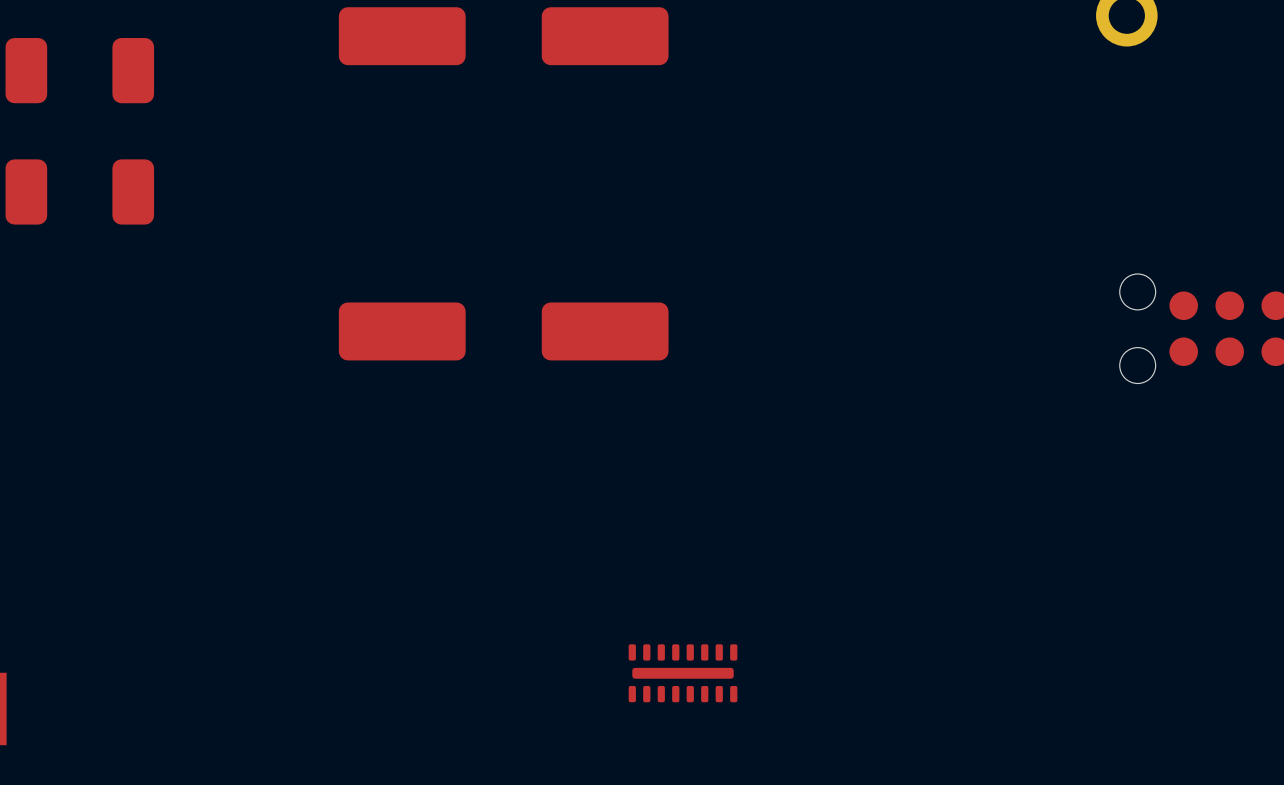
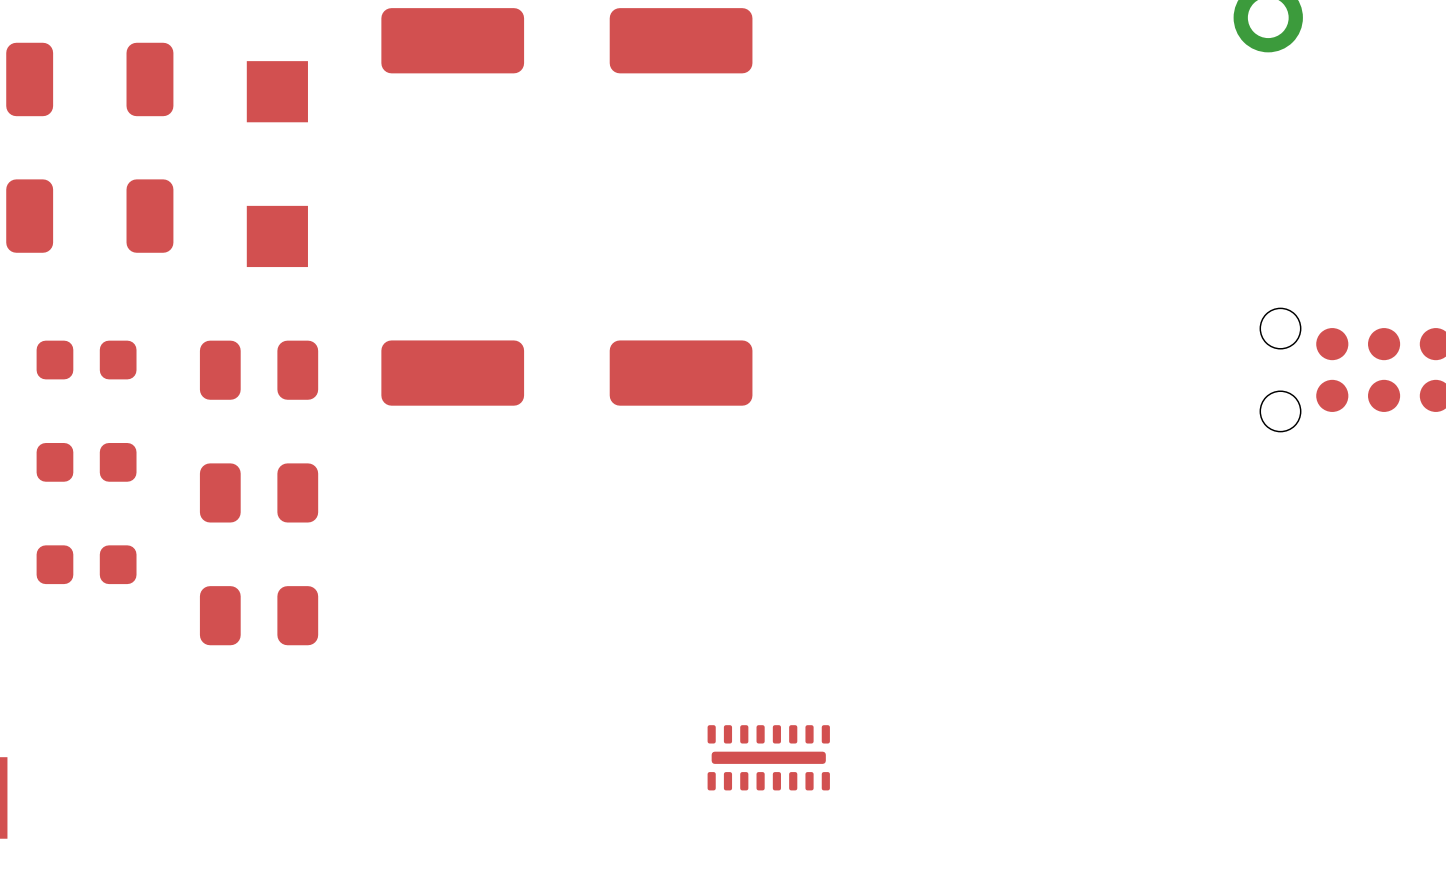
part: none -> (277, 91)
part: none -> (277, 236)
part: none -> (86, 360)
part: none -> (259, 370)
part: none -> (86, 462)
part: none -> (259, 492)
part: none -> (86, 564)
part: none -> (259, 615)

